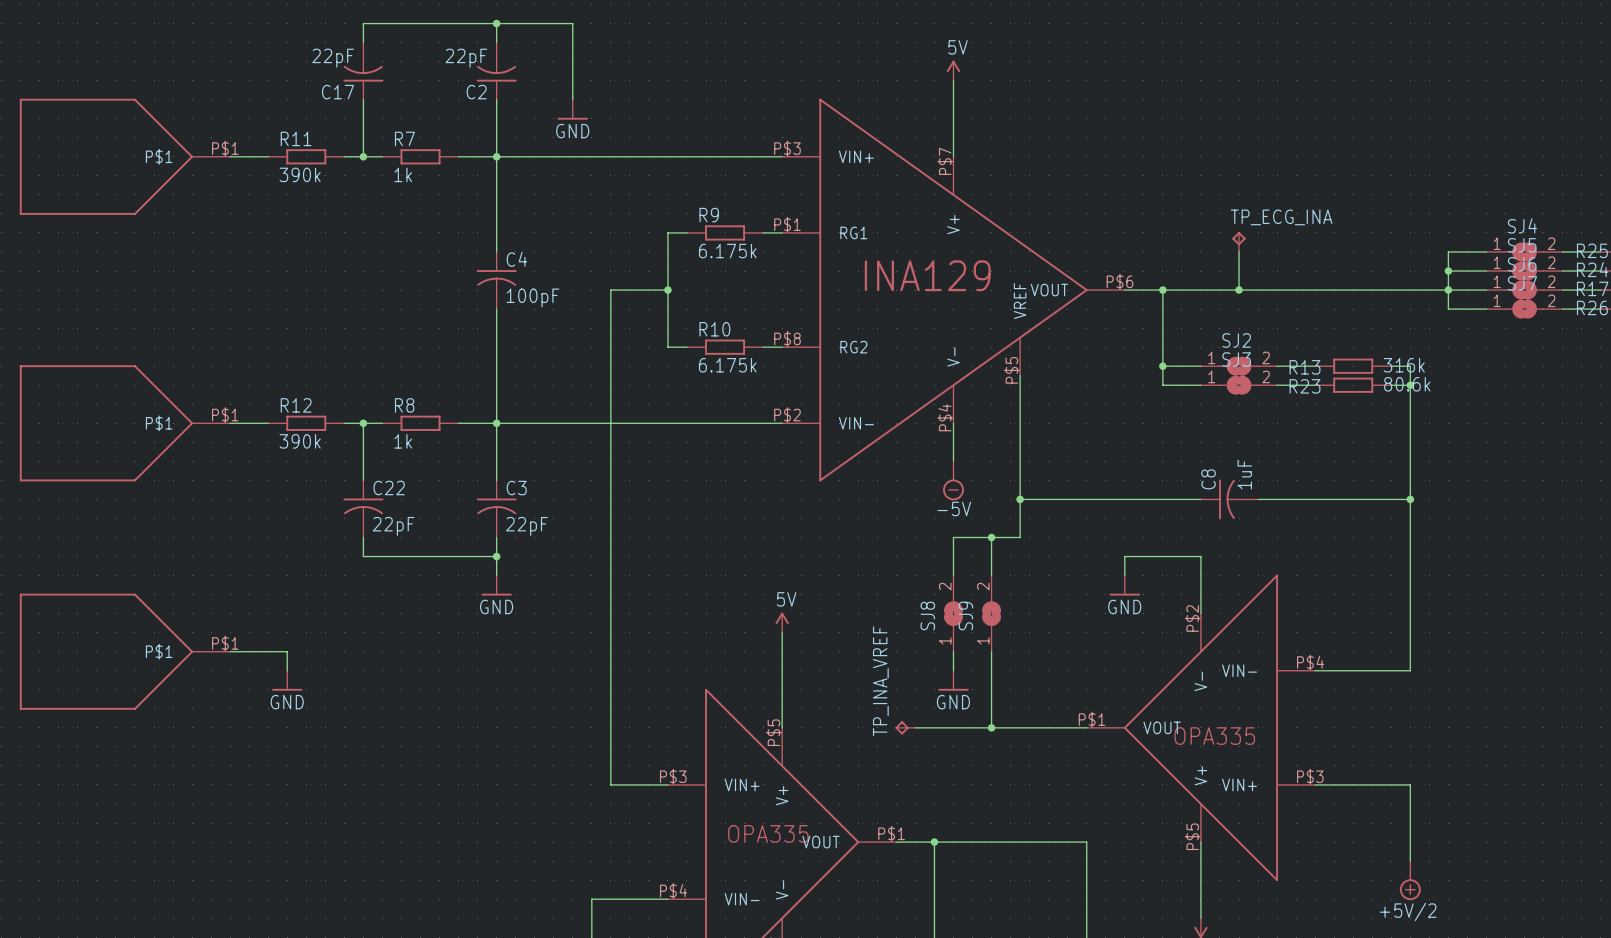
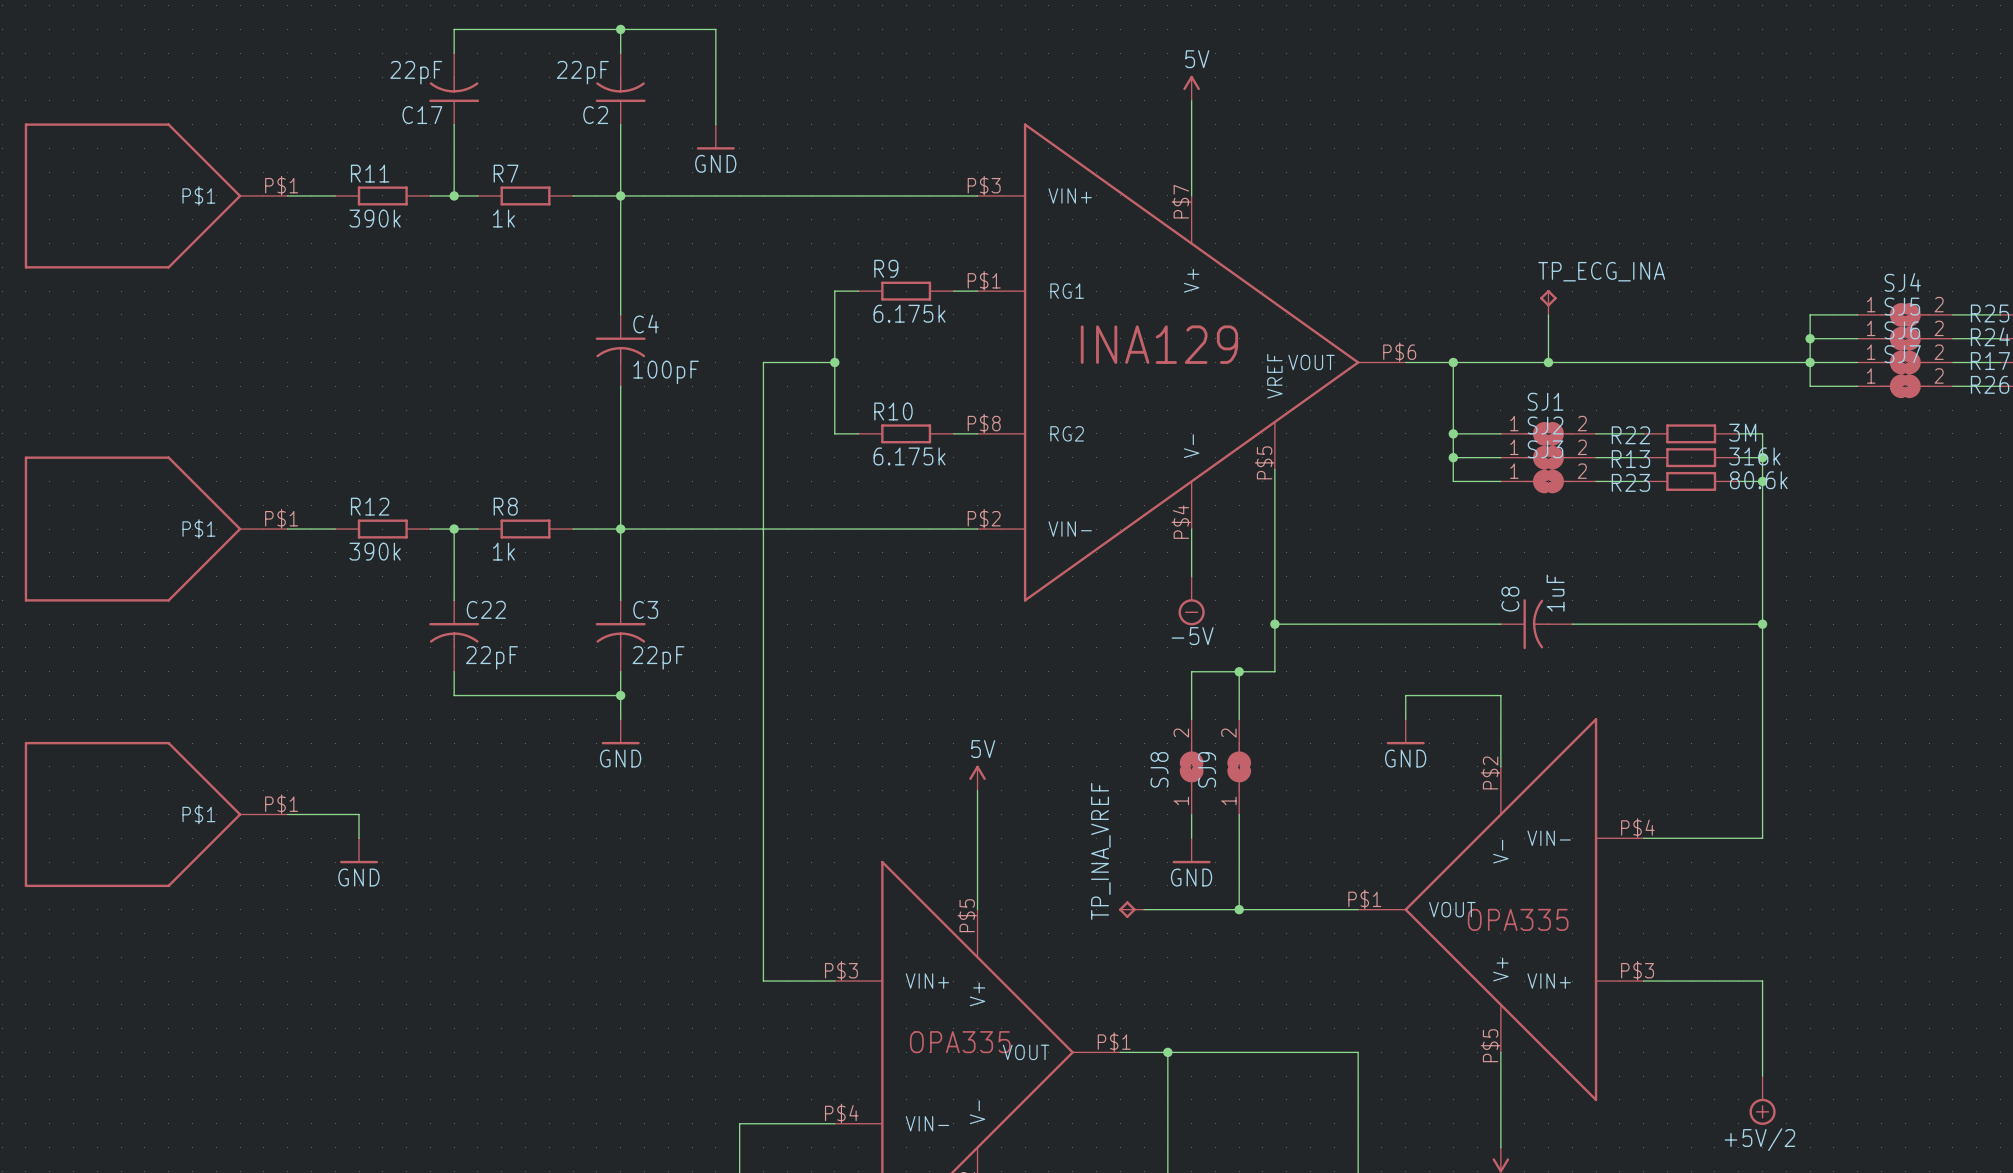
wire: none -> (1453, 433) (1500, 433)
junction: none -> (1453, 433)
SJ1: none -> (1548, 433)
wire: none -> (1596, 433) (1643, 433)
R22: none -> 3M (1691, 433)
wire: none -> (1738, 433) (1762, 433) (1762, 457)
junction: none -> (1762, 457)

